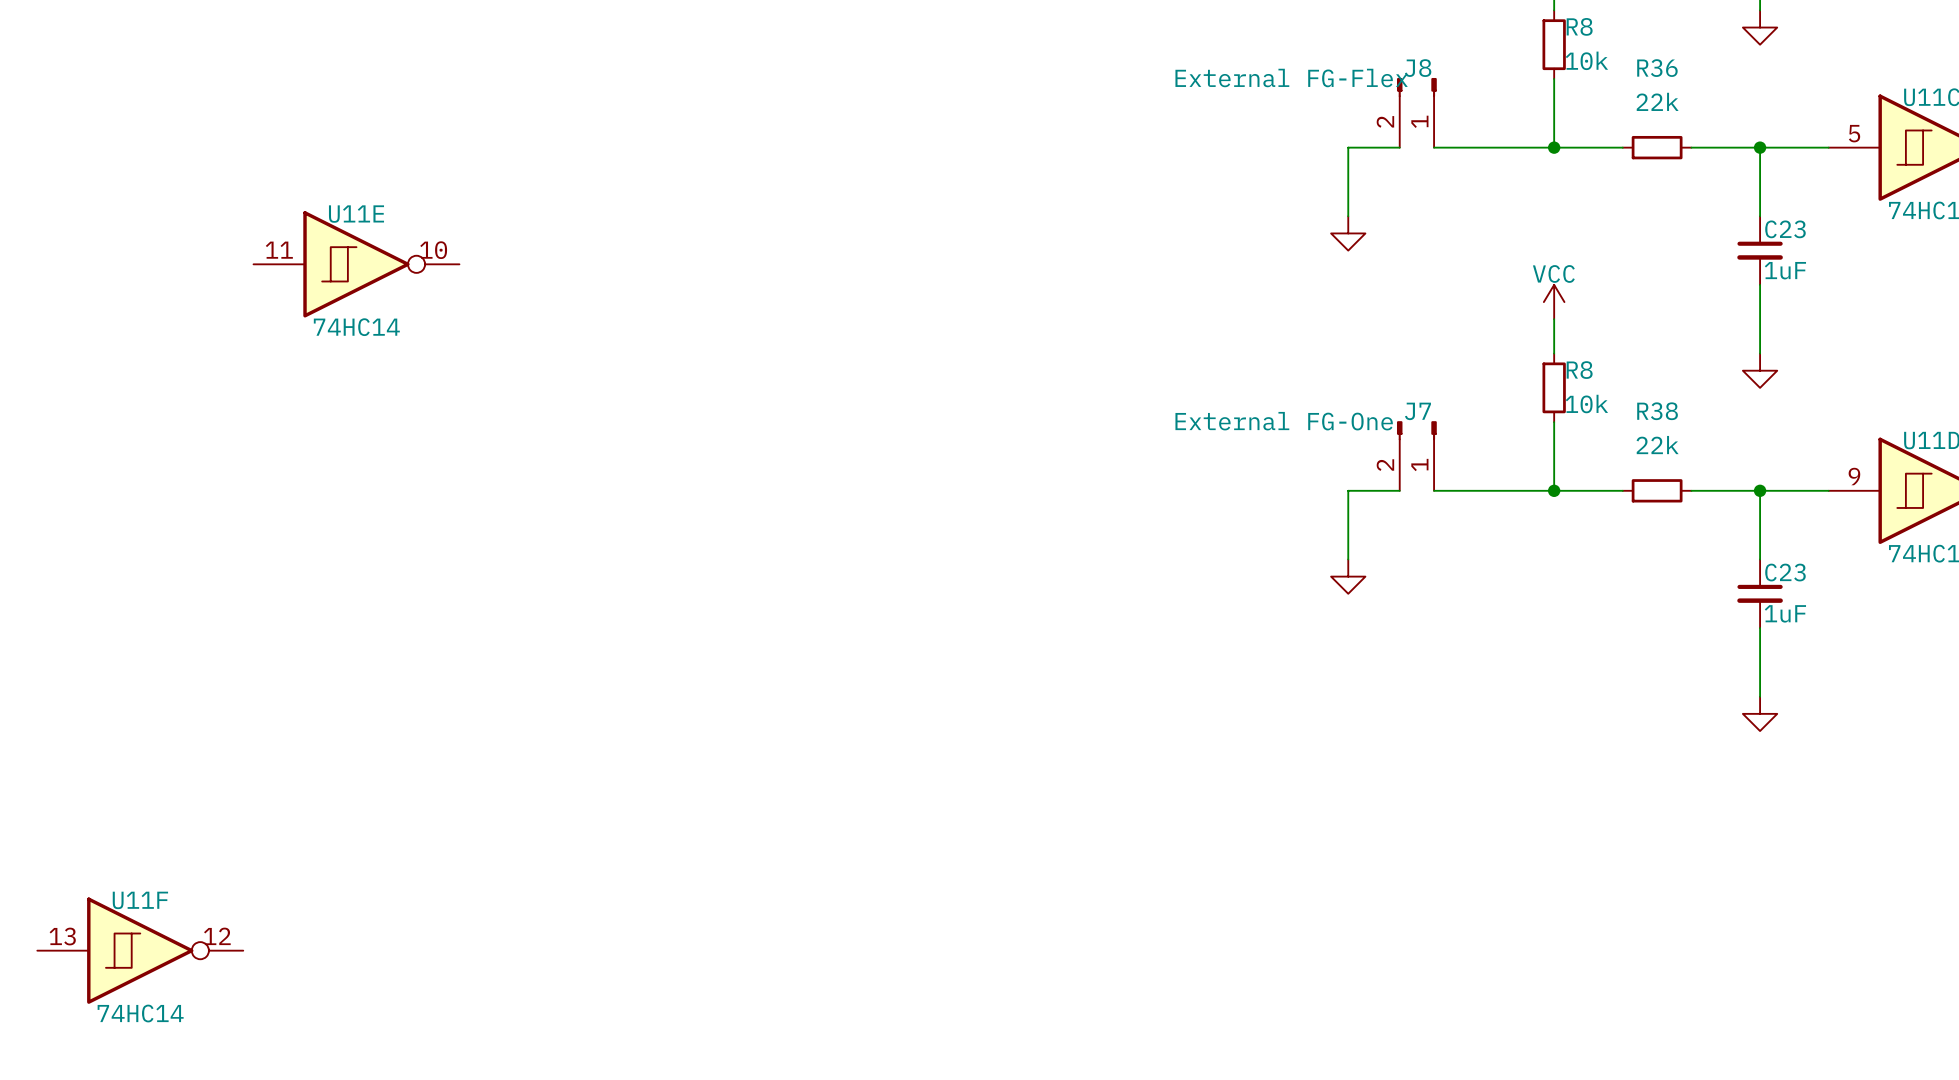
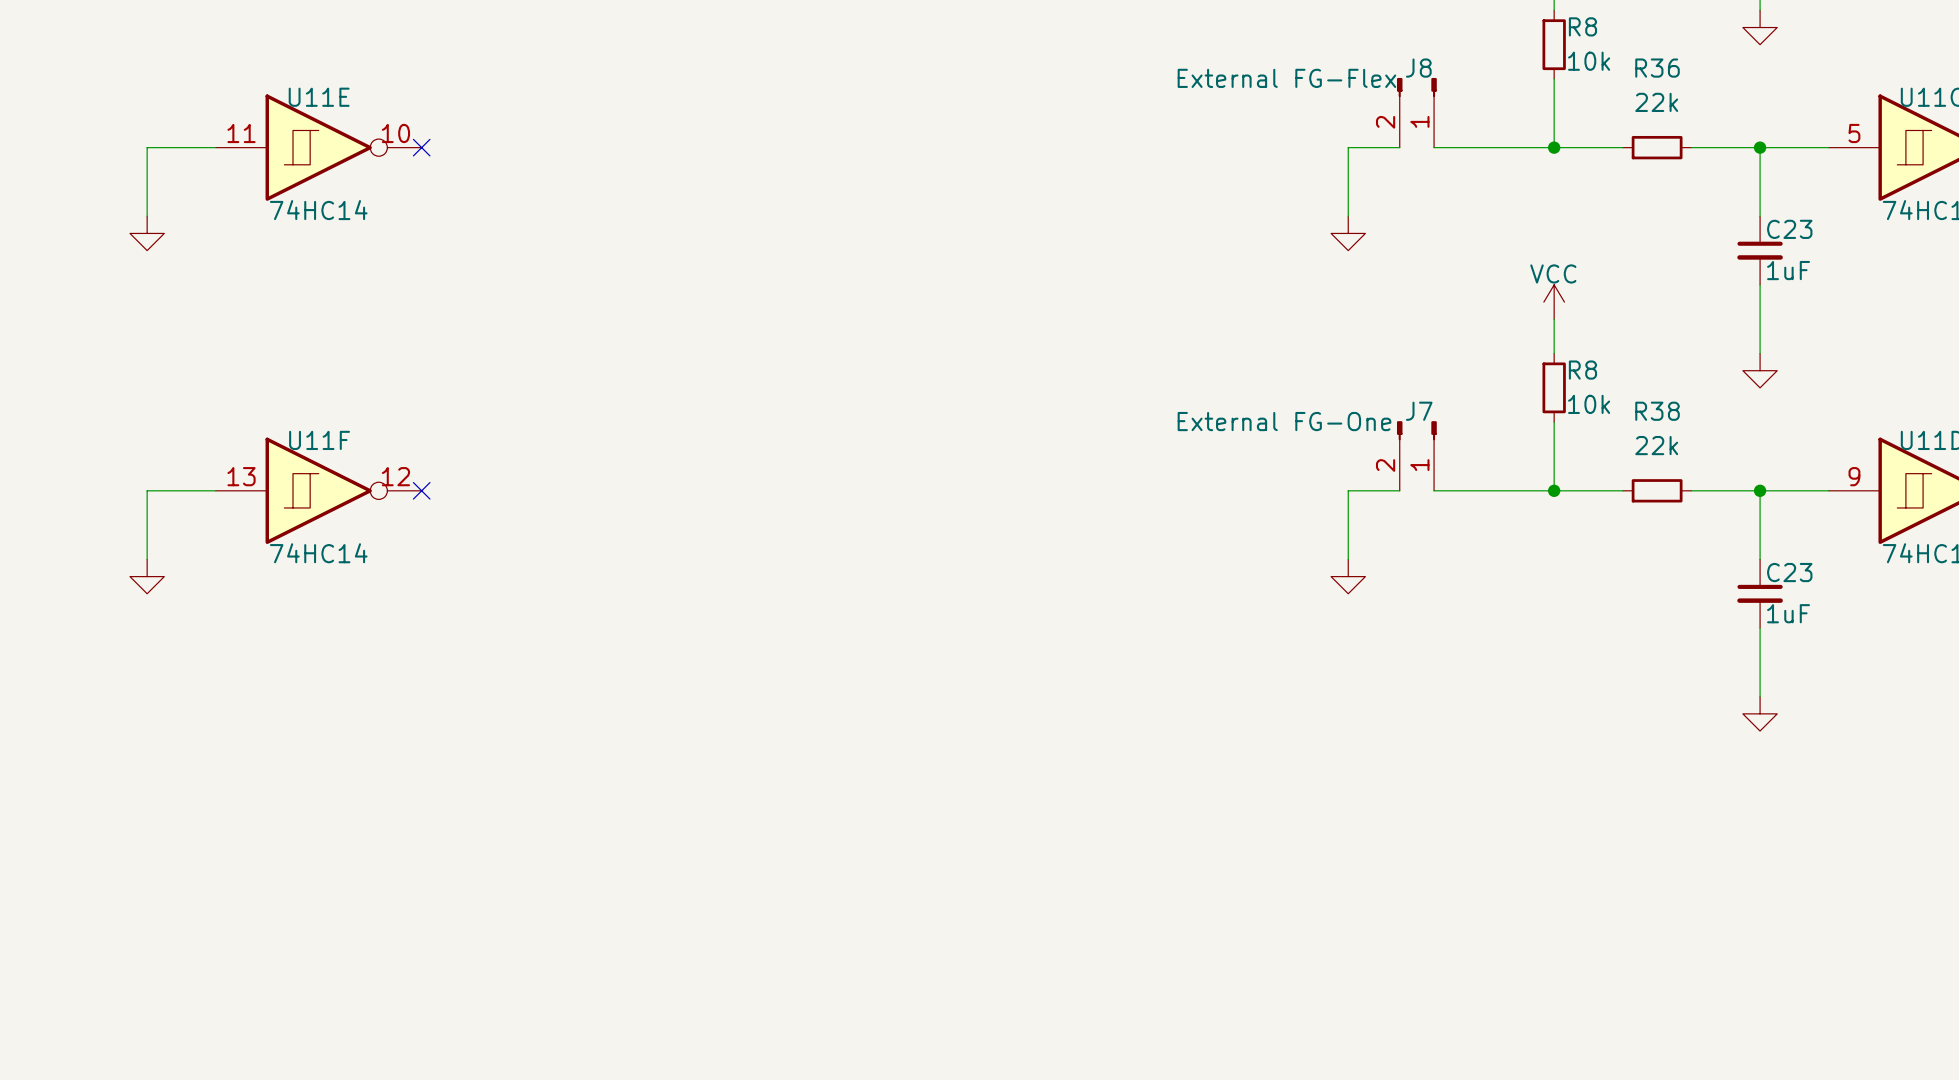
wire: none -> (215, 147) (147, 147) (147, 216)
no-connect mark: none -> (421, 147)
power symbol: none -> (147, 233)
U11E position: (356, 264) -> (318, 147)
wire: none -> (215, 490) (147, 490) (147, 559)
no-connect mark: none -> (421, 490)
power symbol: none -> (147, 576)
U11F position: (140, 950) -> (318, 490)

